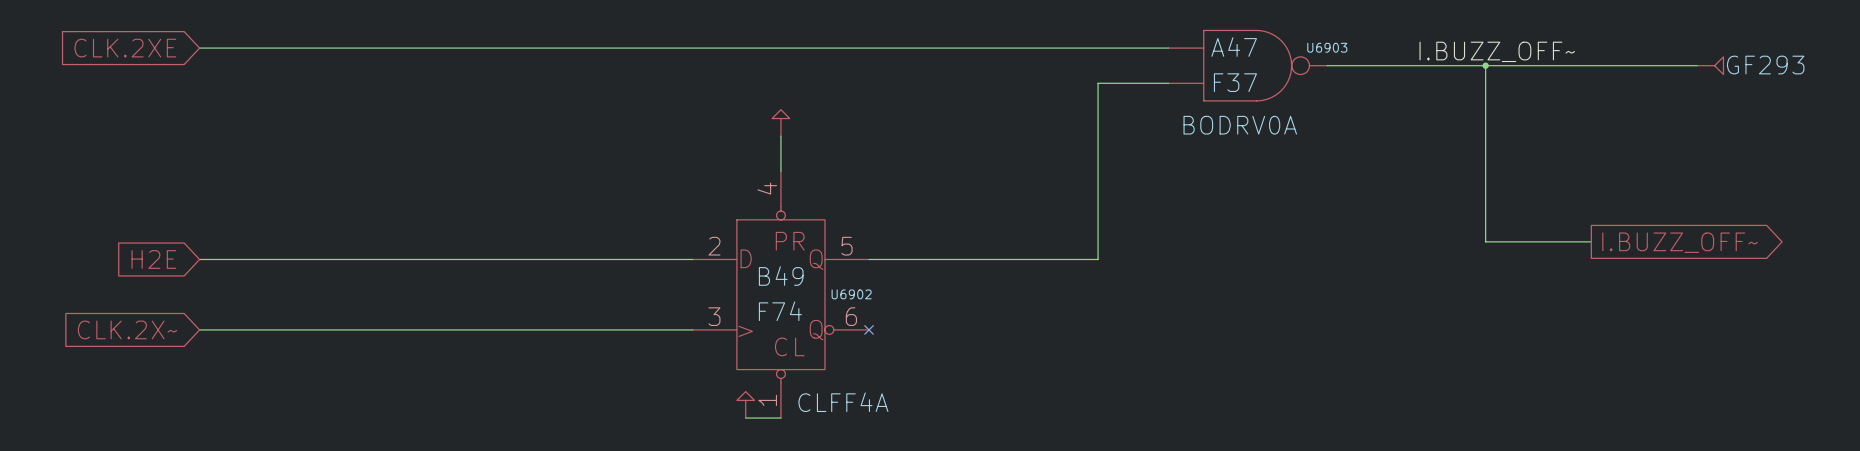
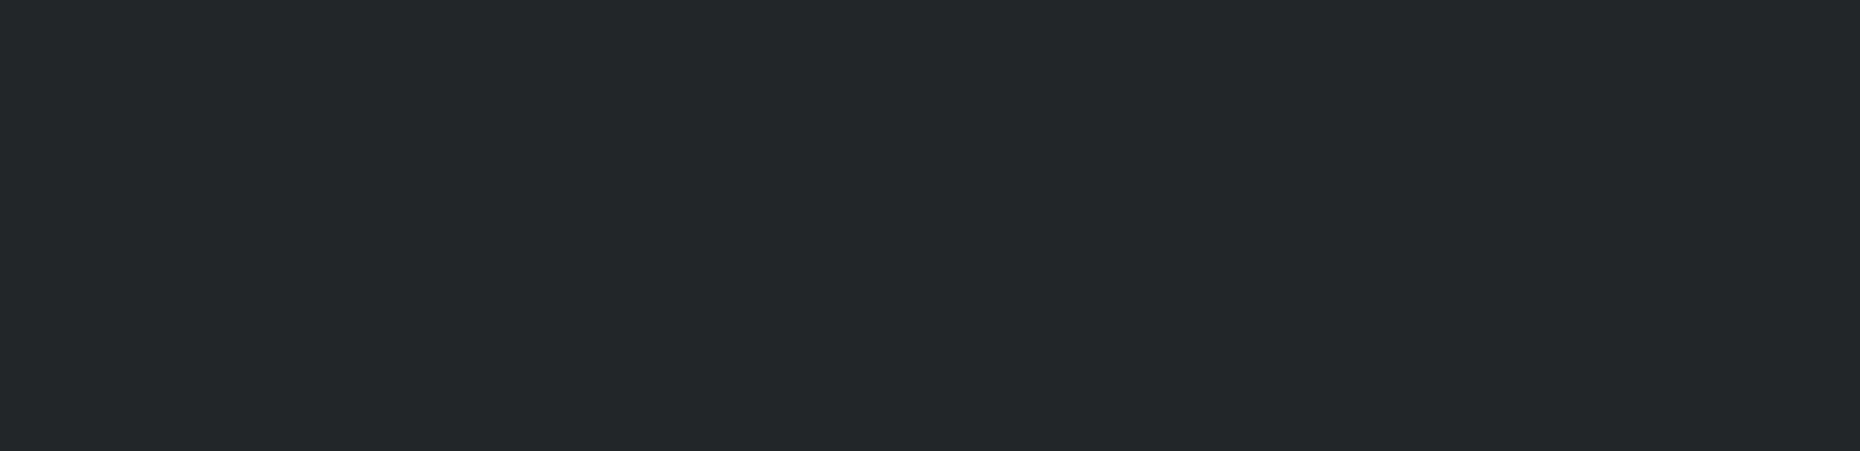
global label: CLK.2XE (125, 48) -> none
wire: (199, 48) (1168, 48) -> none
label: I.BUZZ_OFF~ (1497, 51) -> none
U6903: F37 (1247, 65) -> none
wire: (1327, 65) (1697, 65) -> none
wire: (1485, 65) (1485, 241) (1591, 241) -> none
junction: (1485, 65) -> none
GF293: (1710, 65) -> none
wire: (1168, 83) (1098, 83) (1098, 259) (869, 259) -> none
power symbol: (780, 122) -> none
wire: (780, 136) (780, 171) -> none
global label: I.BUZZ_OFF~ (1680, 242) -> none
global label: H2E (153, 259) -> none
wire: (199, 259) (692, 259) -> none
U6902: F74 (780, 294) -> none
global label: CLK.2X~ (127, 329) -> none
wire: (199, 329) (692, 329) -> none
no-connect mark: (869, 329) -> none
power symbol: (745, 404) -> none
wire: (745, 418) (780, 418) -> none

